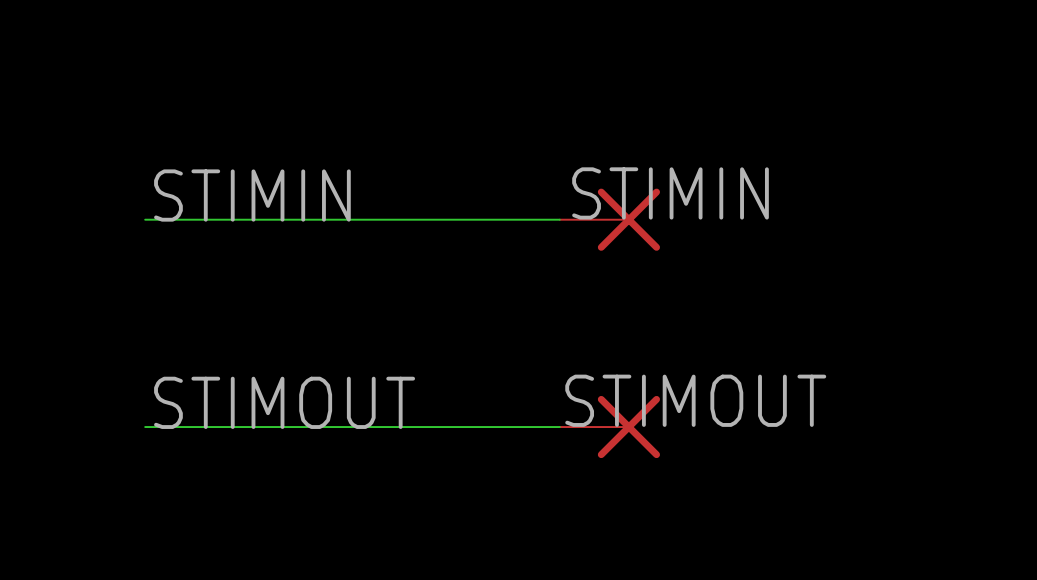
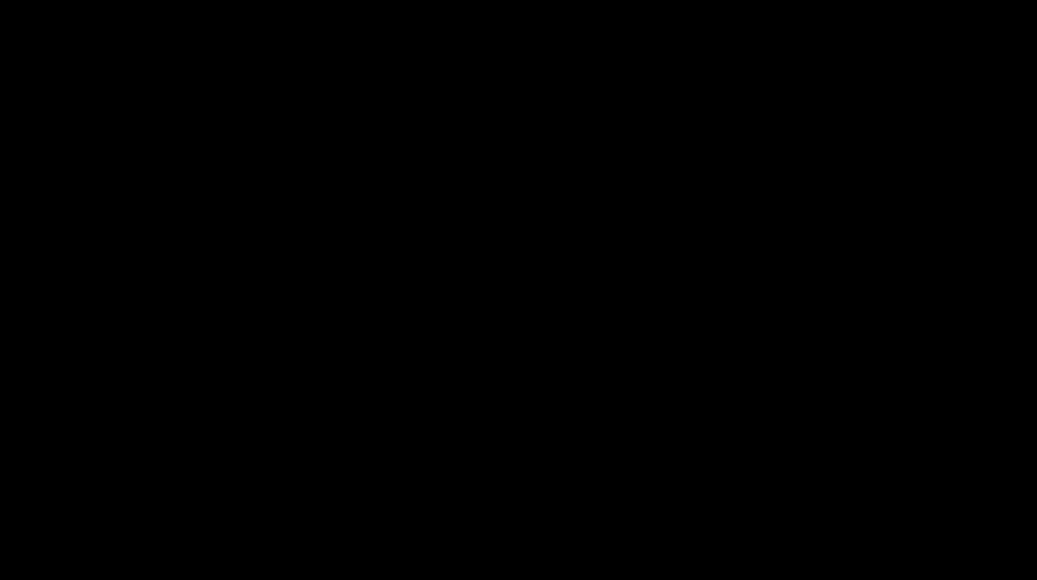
label: STIMIN (252, 195) -> none
wire: (145, 219) (559, 219) -> none
STIMIN: (609, 219) -> none
label: STIMOUT (284, 402) -> none
wire: (145, 427) (559, 427) -> none
STIMOUT: (609, 427) -> none

